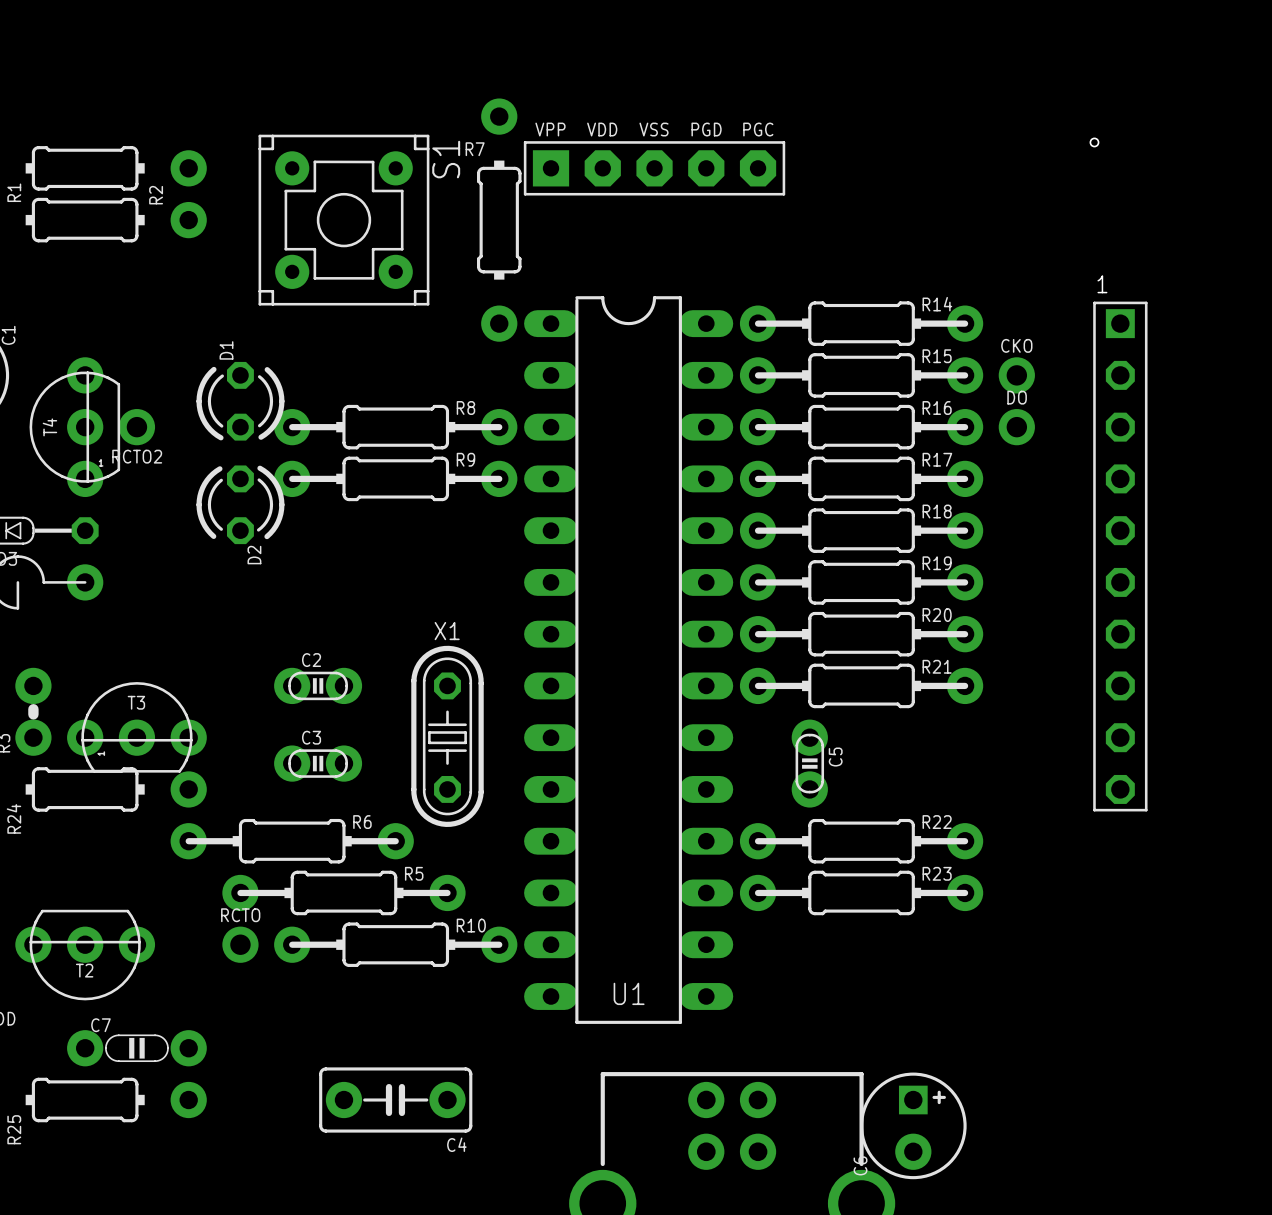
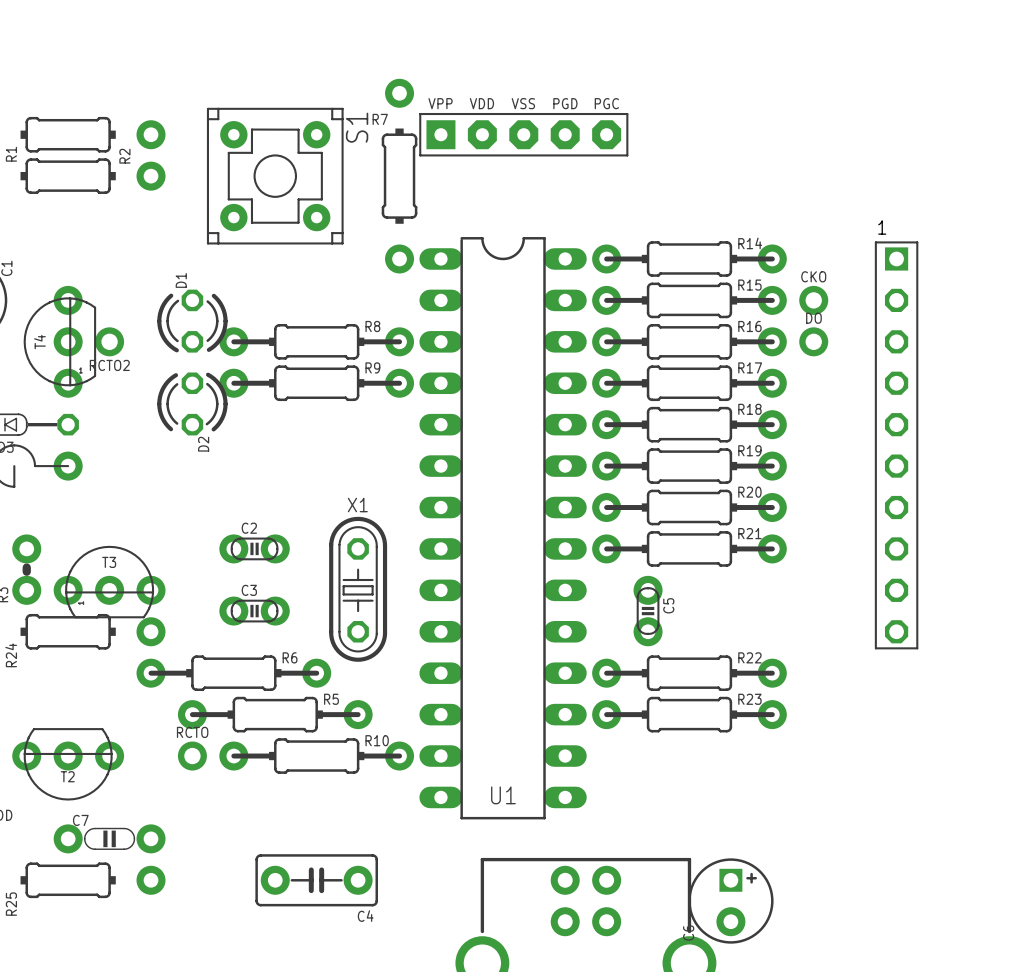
hole: (1094, 142) -> none

